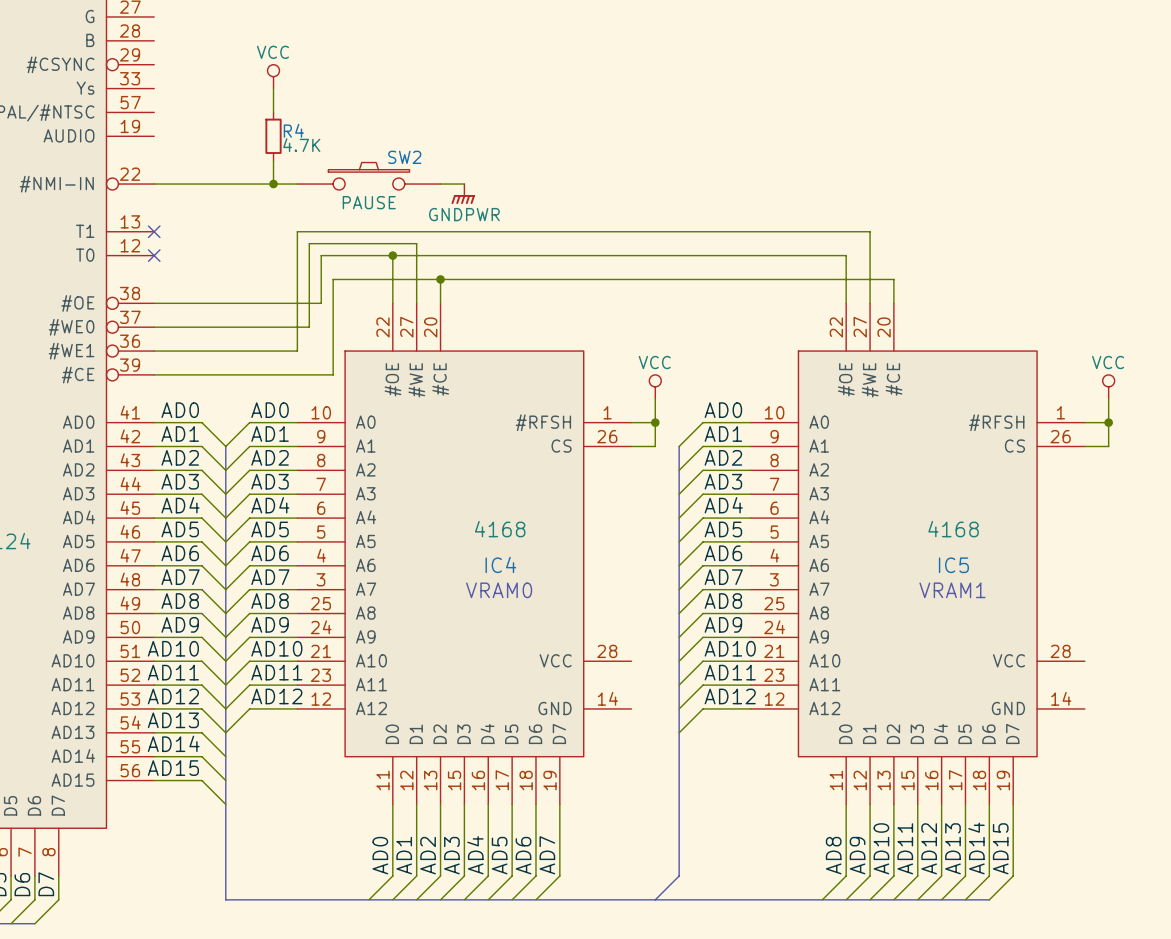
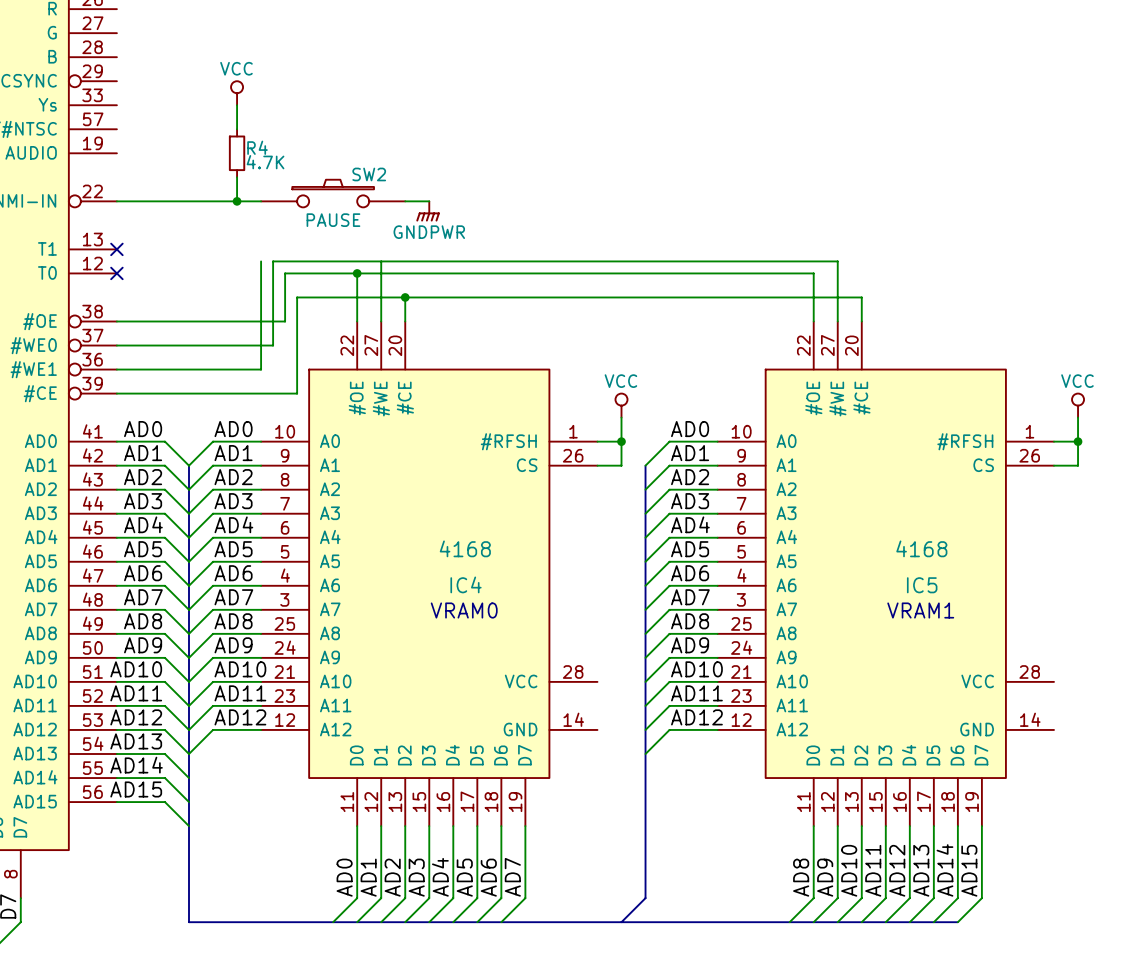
wire: (297, 243) (297, 231) (870, 231) (870, 243) -> (381, 261) (837, 261)

